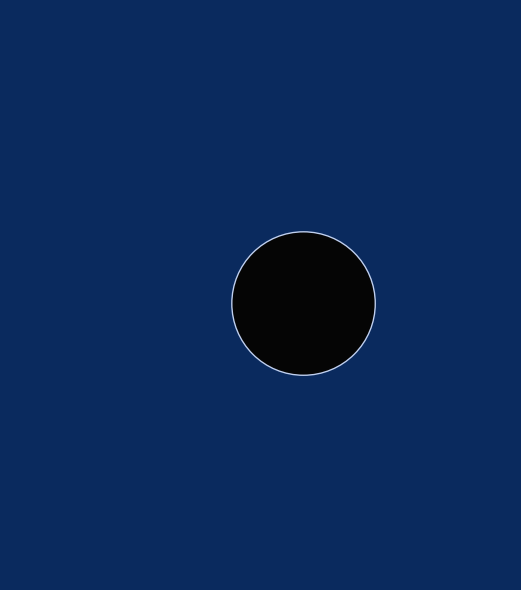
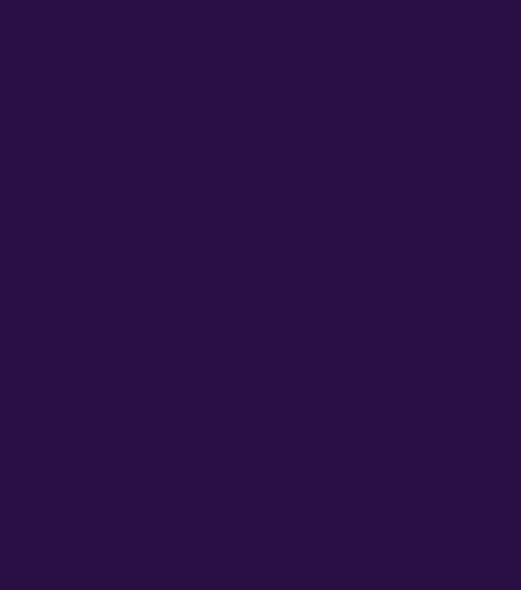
part: (303, 303) -> none

